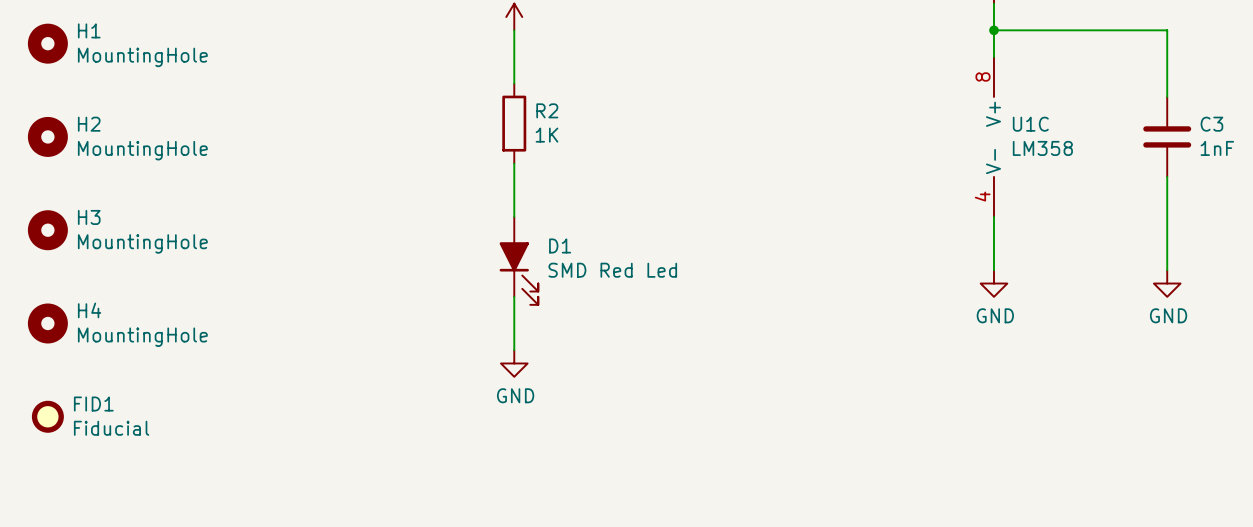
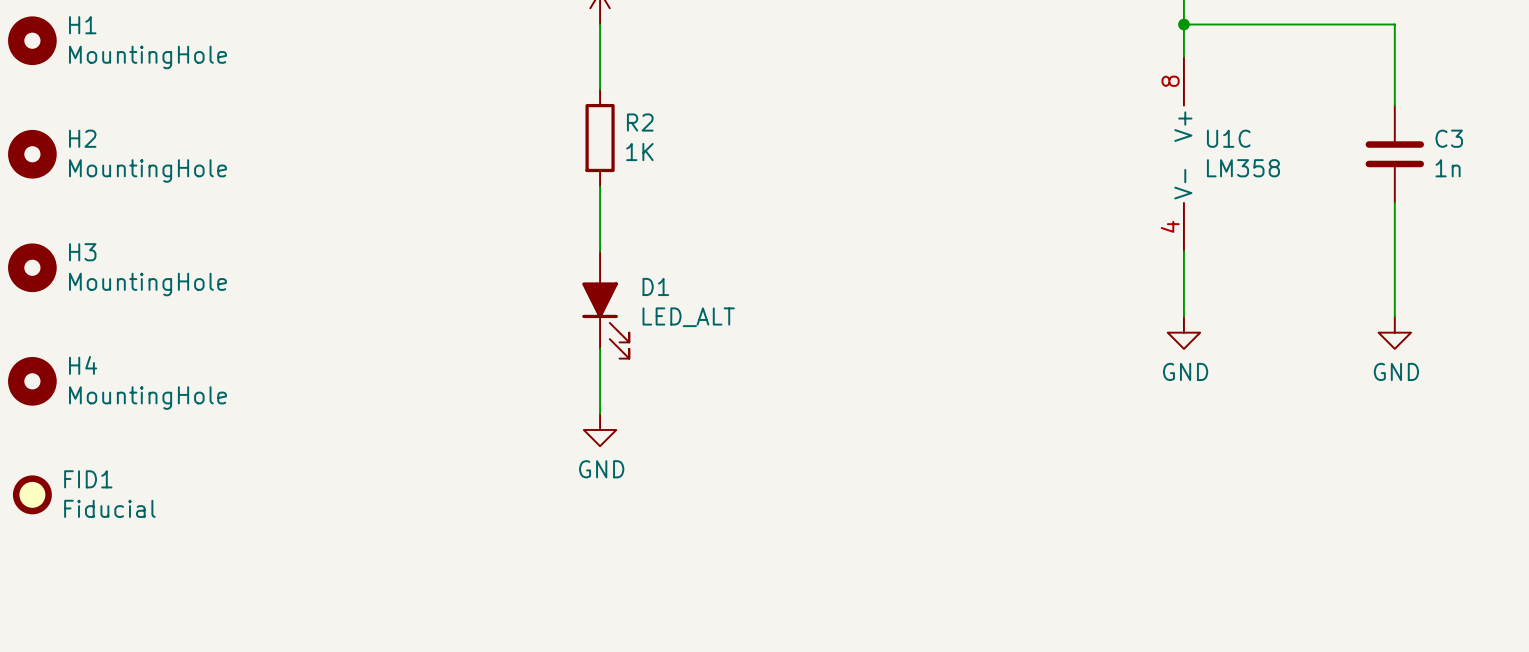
C3 value: 1nF (1217, 148) -> 1n (1448, 168)
D1 value: SMD Red Led (612, 270) -> LED_ALT (688, 317)

